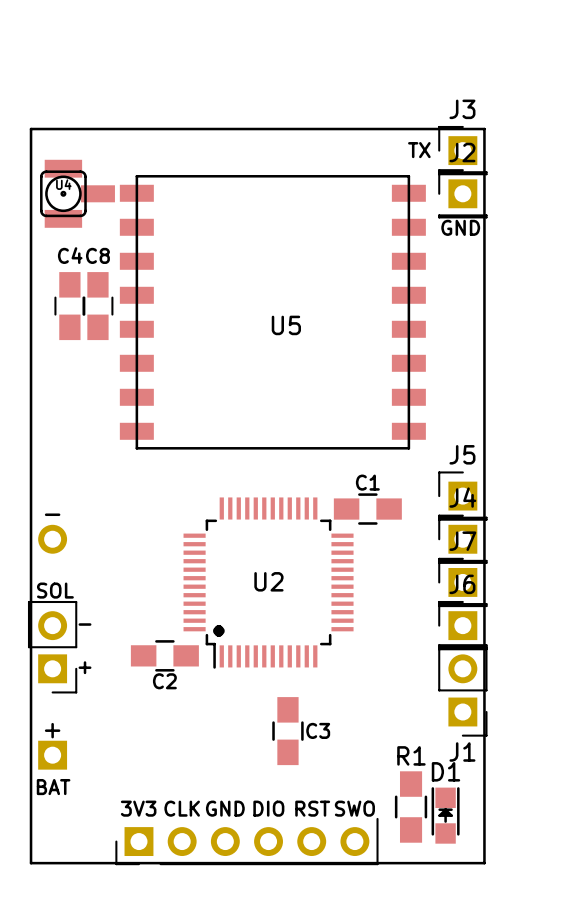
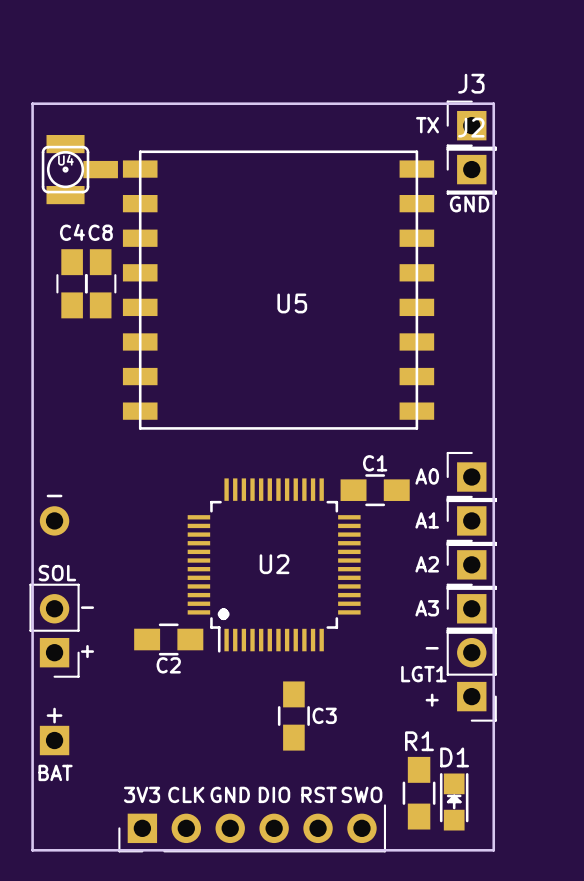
J5 name: J5 (462, 454) -> A0 (427, 476)
J4 name: J4 (462, 497) -> A1 (427, 520)
J7 name: J7 (462, 541) -> A2 (427, 564)
J6 name: J6 (462, 584) -> A3 (427, 608)
text: none -> - (432, 648)
text: none -> + (432, 700)
J1 name: J1 (462, 752) -> LGT1 (423, 674)

